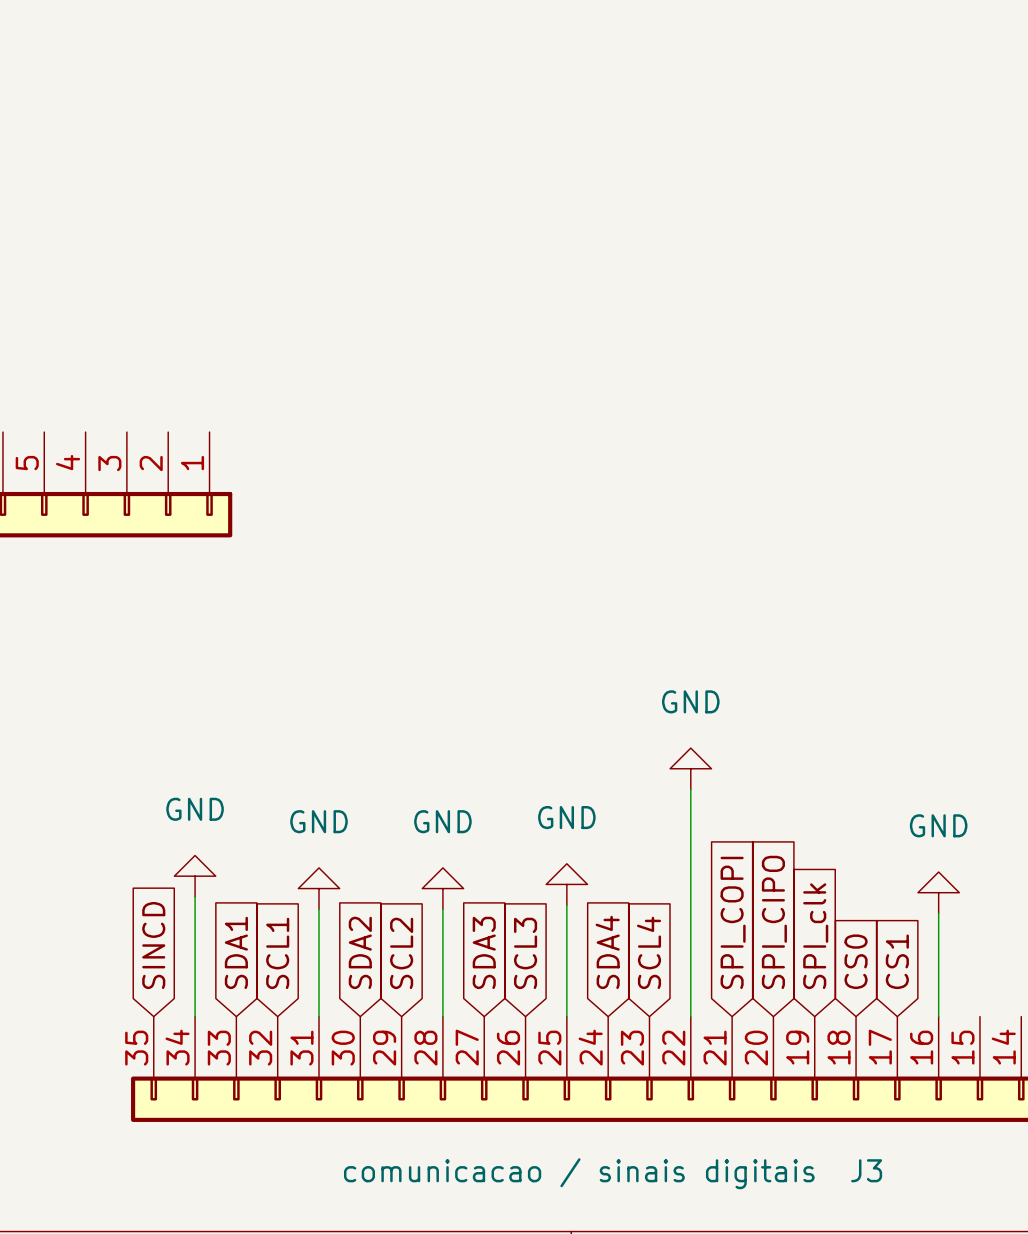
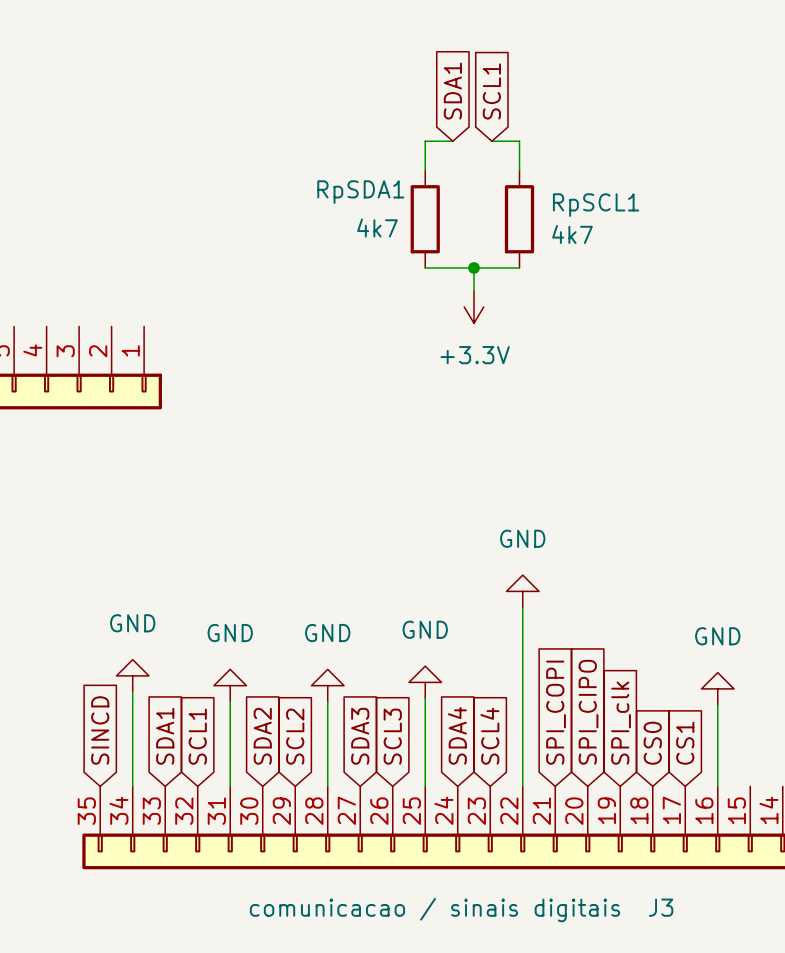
global label: none -> SDA1 (452, 91)
global label: none -> SCL1 (491, 91)
wire: none -> (452, 141) (425, 141) (425, 170)
wire: none -> (491, 141) (519, 141) (519, 170)
RpSDA1: none -> 4k7 (425, 219)
RpSCL1: none -> 4k7 (519, 219)
wire: none -> (425, 267) (519, 267)
wire: none -> (474, 267) (474, 290)
junction: none -> (474, 267)
power symbol: none -> +3.3V (474, 306)

